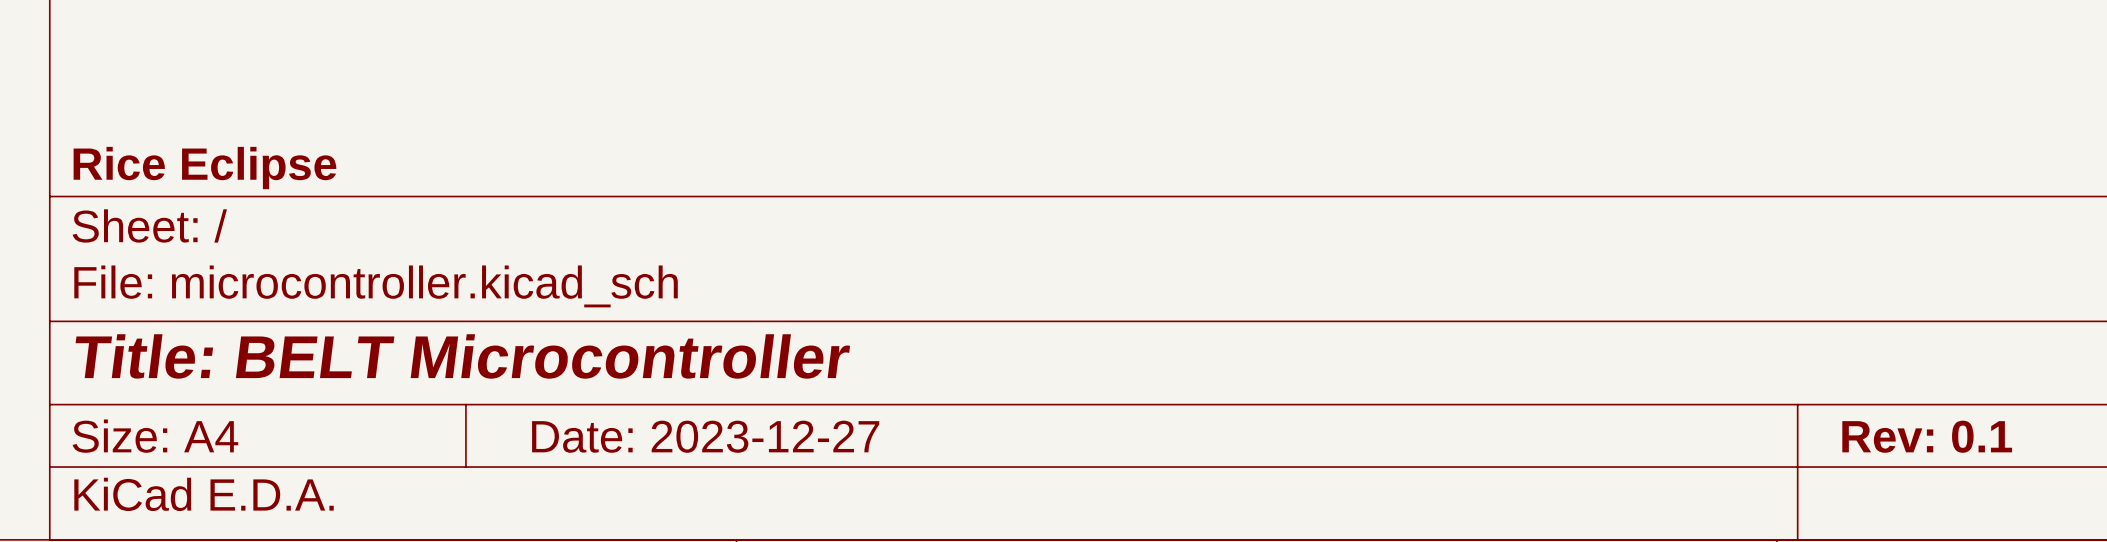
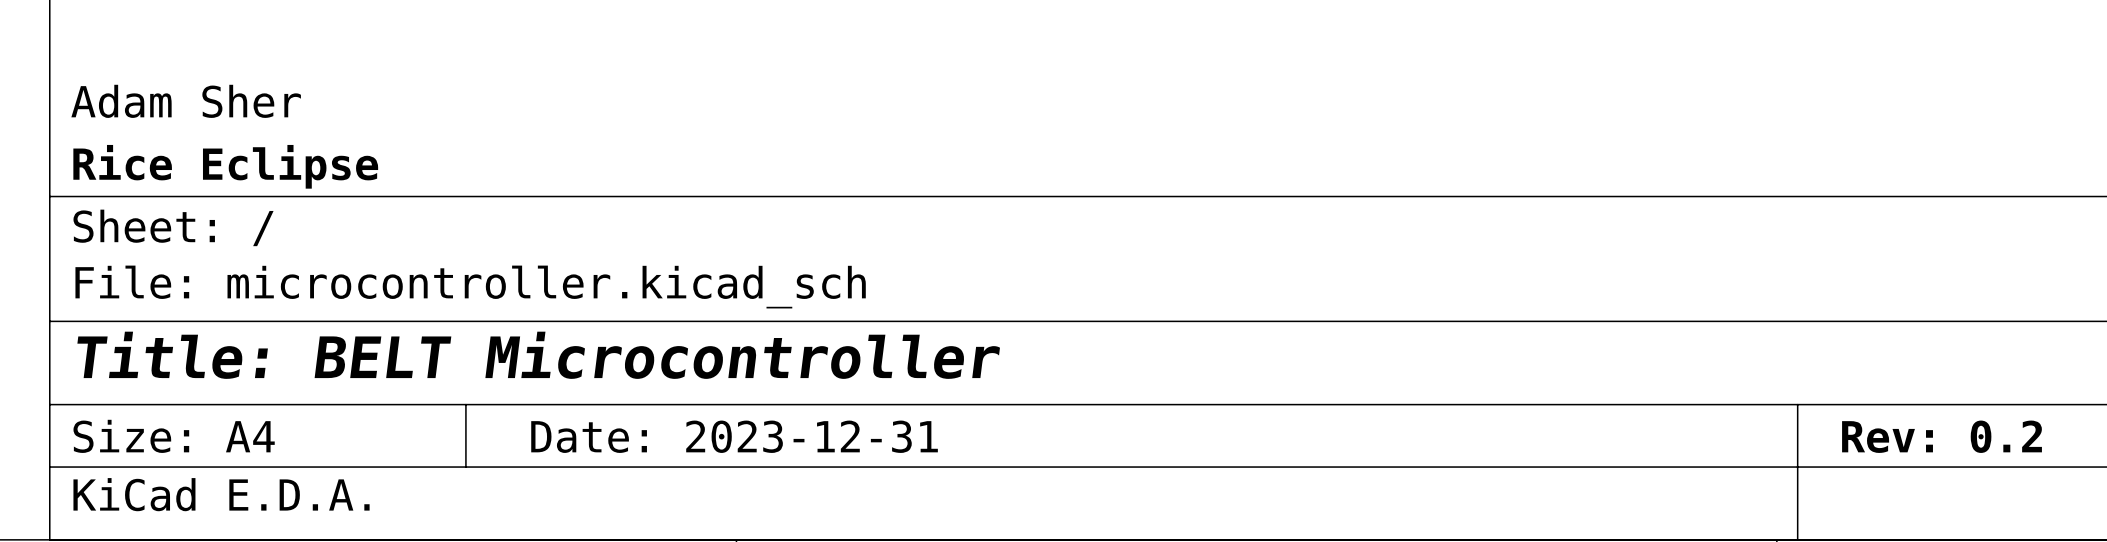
title block: none -> Adam Sher (186, 101)
title block: Date: 2023-12-27 (705, 436) -> Date: 2023-12-31 (734, 436)
title block: Rev: 0.1 (1927, 436) -> Rev: 0.2 (1942, 436)

